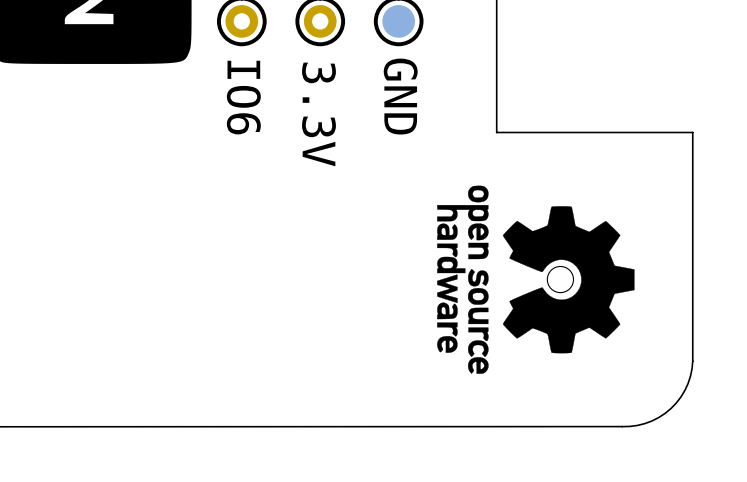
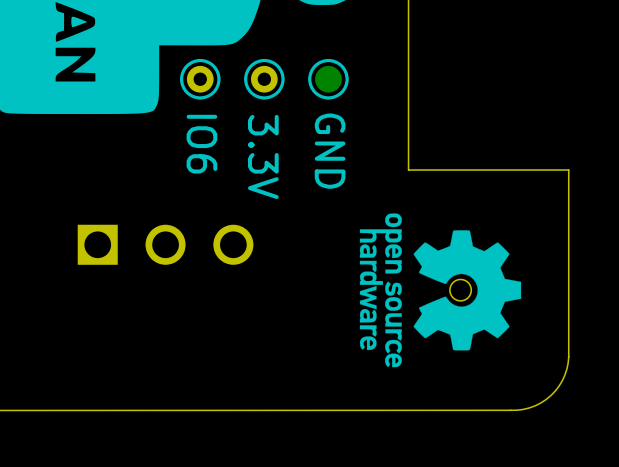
part: none -> (165, 244)

